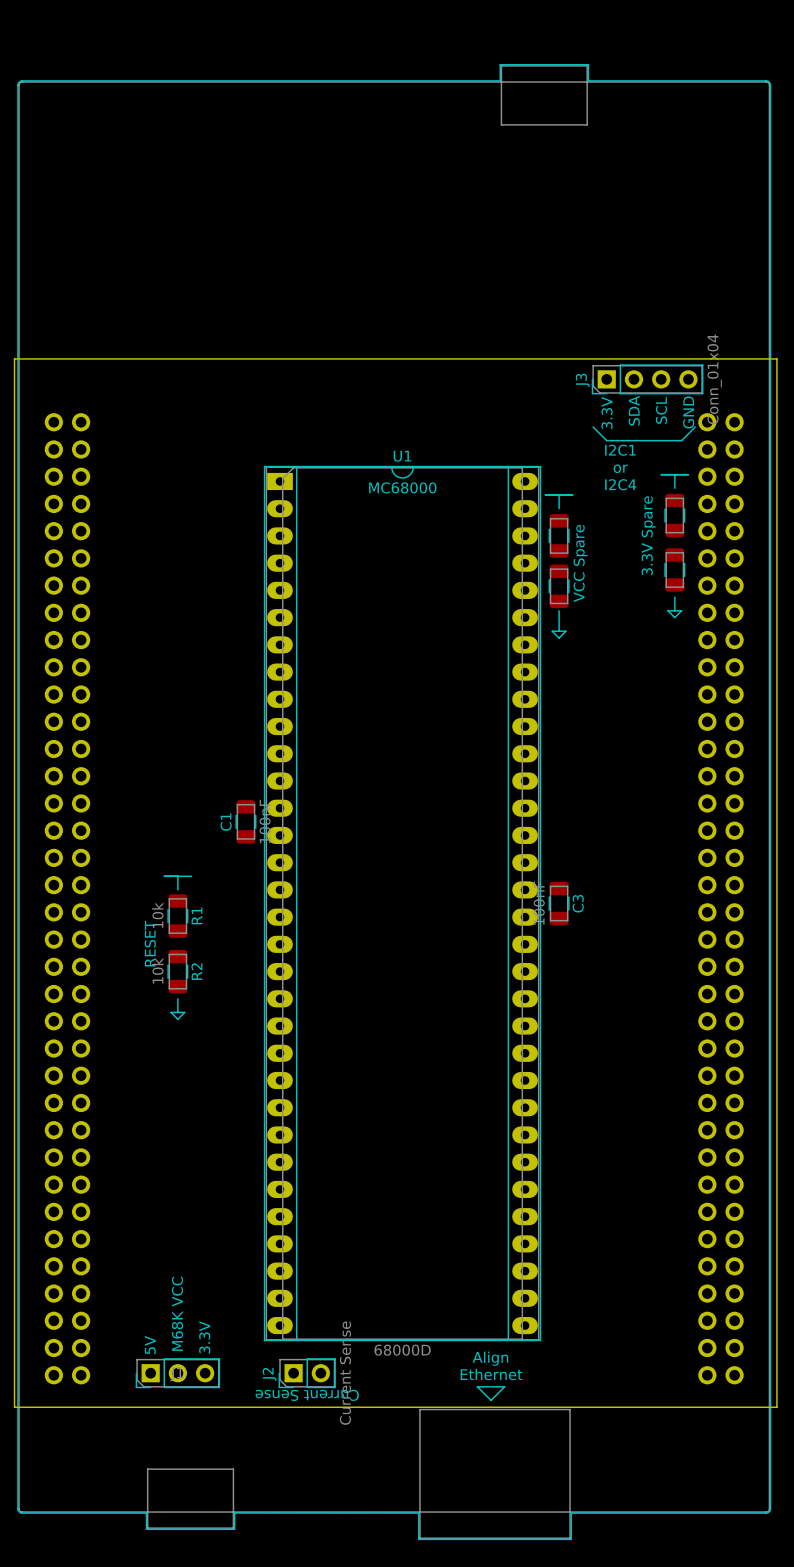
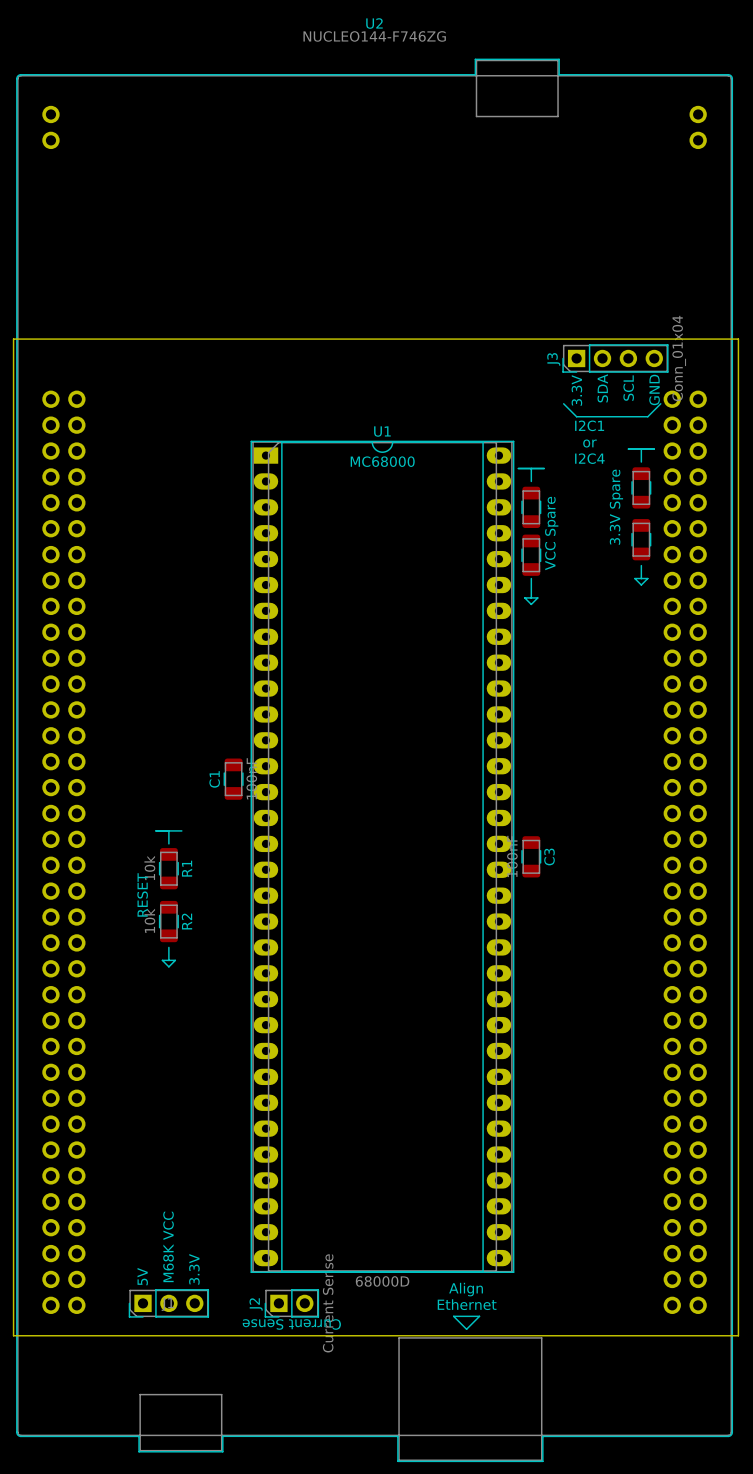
U2: none -> NUCLEO144-F746ZG (374, 760)

